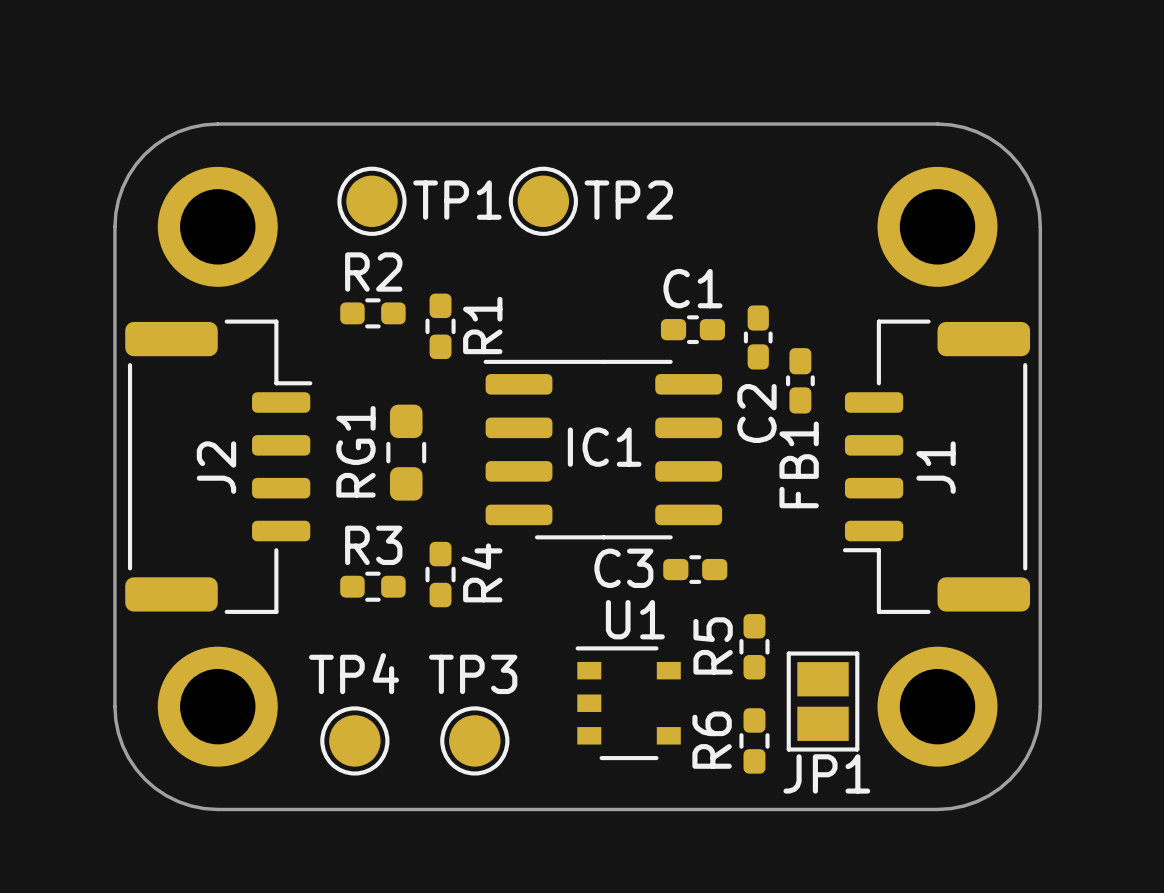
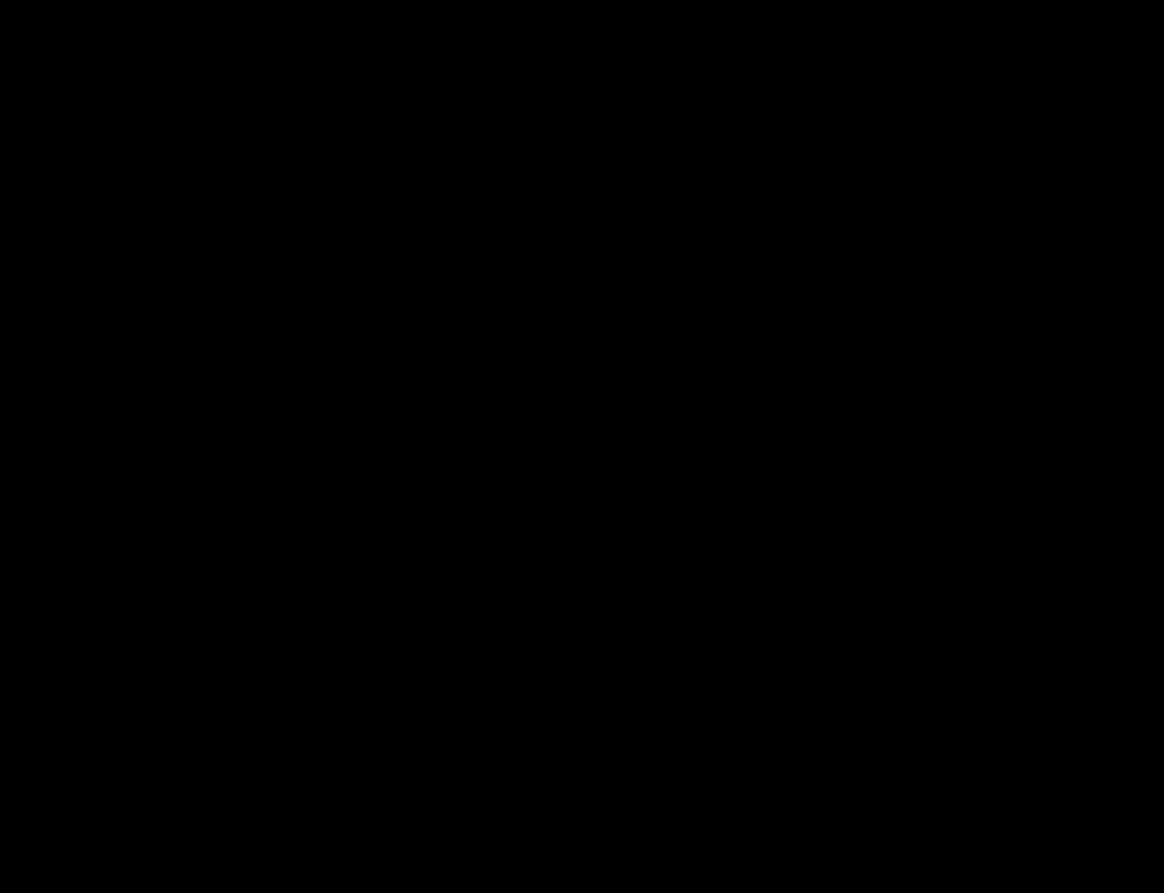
board edge: (217, 124) (937, 124) (964, 127) (976, 131) (1000, 145) (1019, 164) (1026, 175) (1036, 200) (1040, 226) (1040, 706) (1036, 733) (1026, 758) (1019, 769) (1000, 788) (976, 801) (950, 808) (937, 809) (217, 809) (204, 808) (178, 801) (155, 788) (136, 769) (128, 758) (122, 746) (115, 720) (115, 213) (118, 200) (128, 175) (145, 154) (155, 145) (178, 131) (191, 127) (217, 124) -> none
TP1: (371, 201) -> none
TP2: (543, 201) -> none
part: (217, 226) -> none
part: (937, 226) -> none
R2: (372, 313) -> none
R1: (440, 326) -> none
C1: (692, 329) -> none
C2: (758, 337) -> none
FB1: (800, 380) -> none
IC1: (602, 449) -> none
RG1: (406, 452) -> none
J2: (218, 466) -> none
J1: (936, 466) -> none
C3: (695, 569) -> none
R4: (440, 574) -> none
R3: (372, 586) -> none
R5: (754, 646) -> none
JP1: (823, 701) -> none
U1: (628, 703) -> none
part: (217, 706) -> none
part: (937, 706) -> none
TP4: (354, 740) -> none
TP3: (474, 740) -> none
R6: (754, 740) -> none

